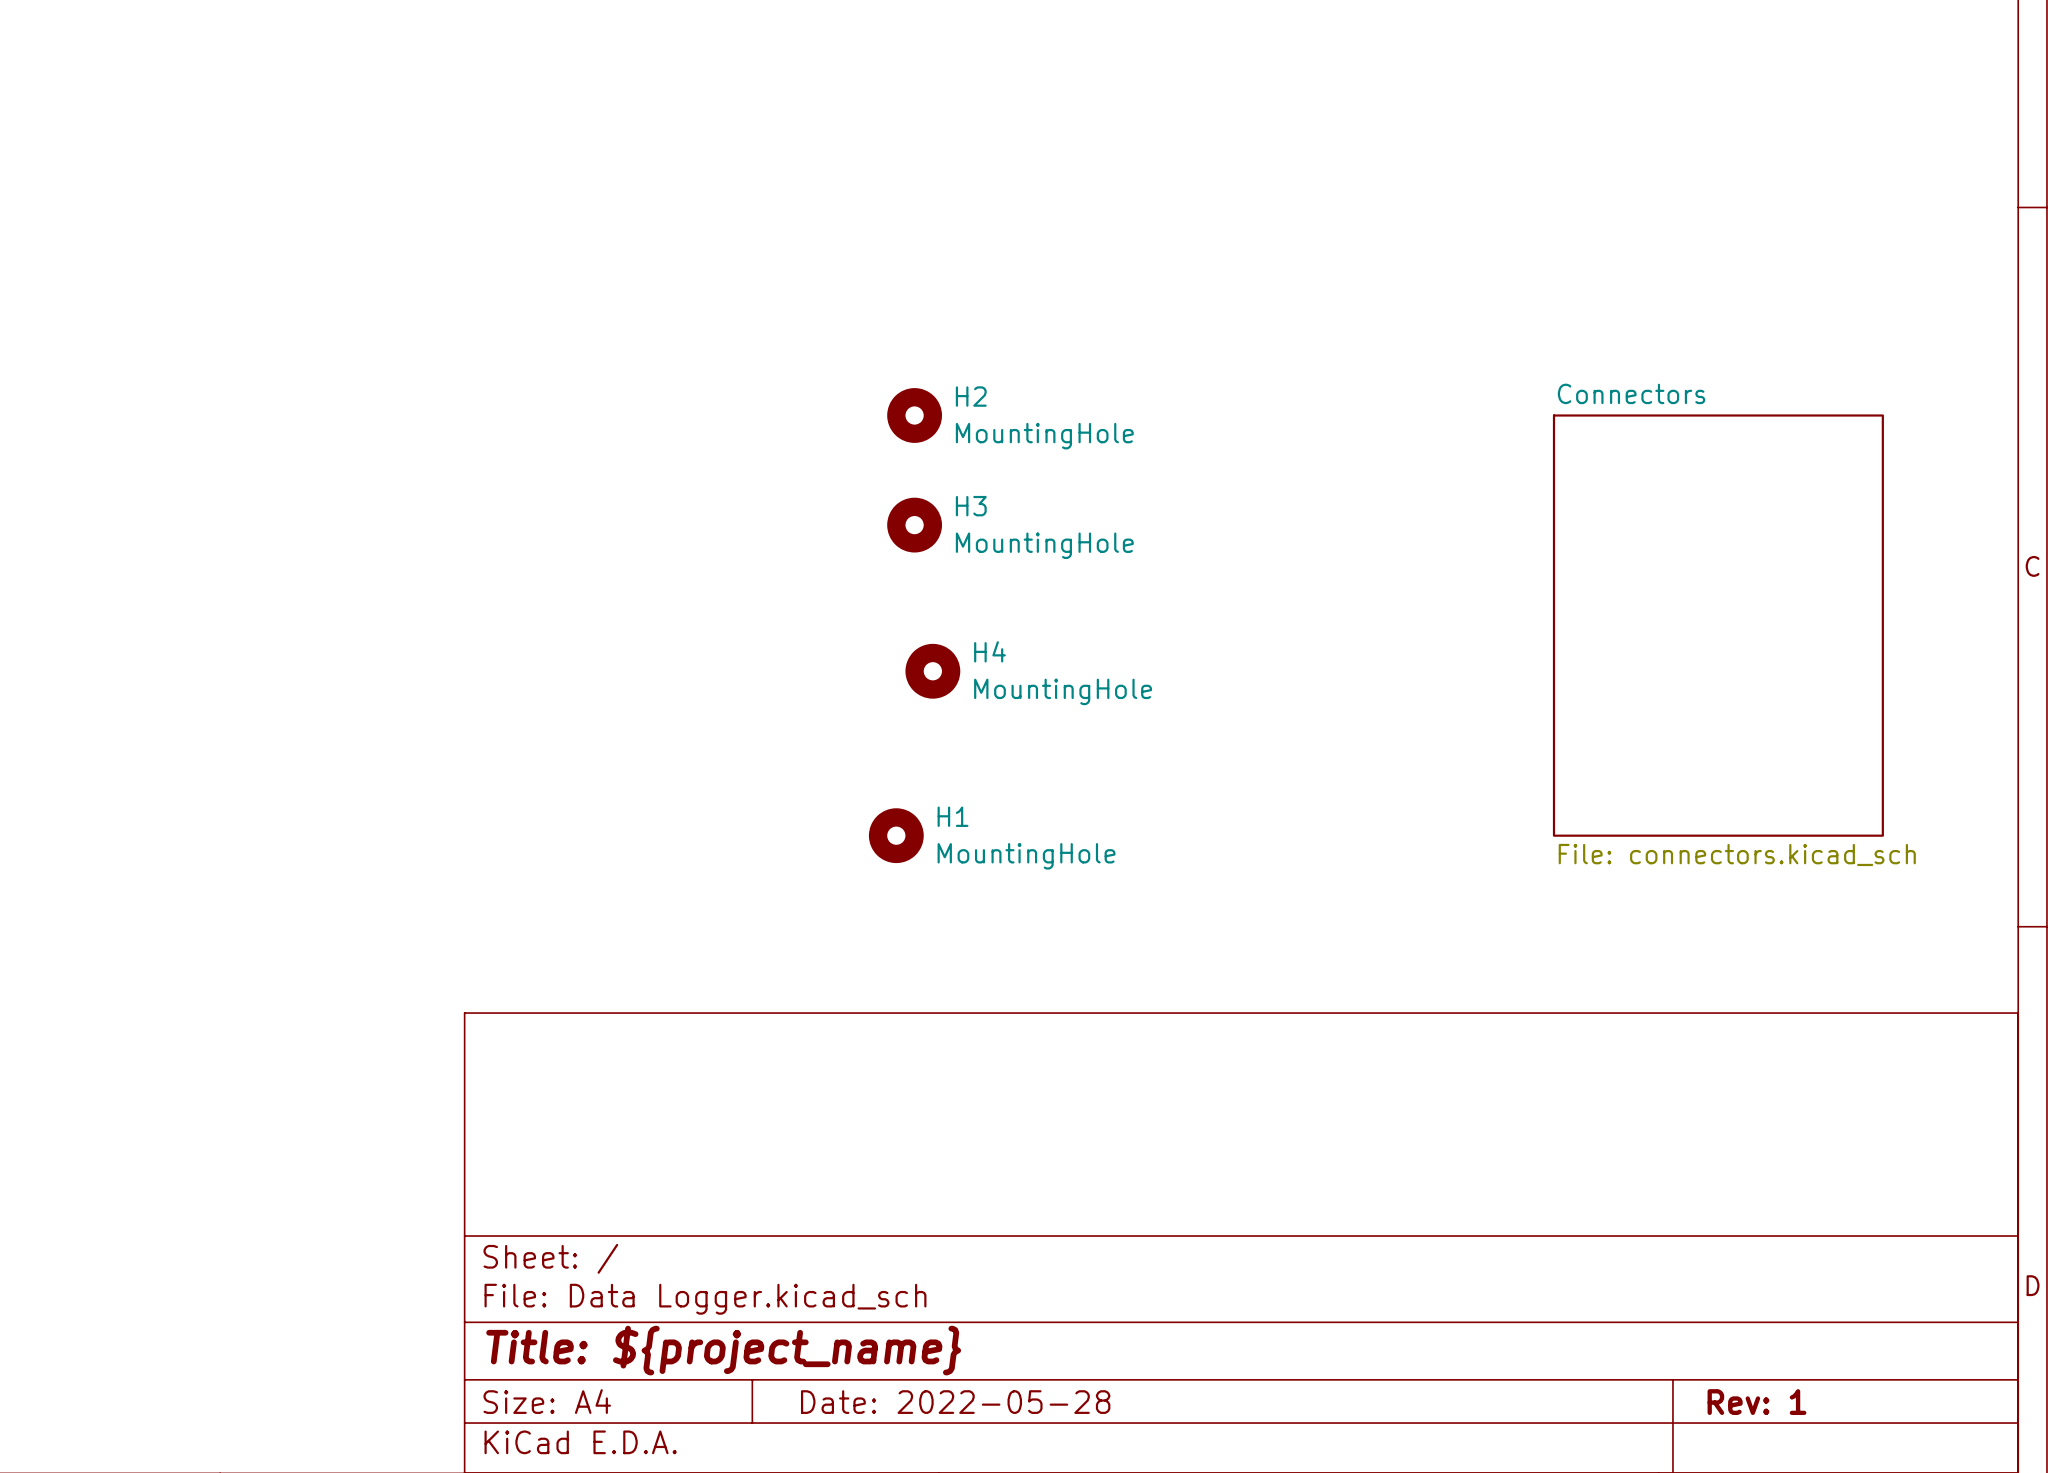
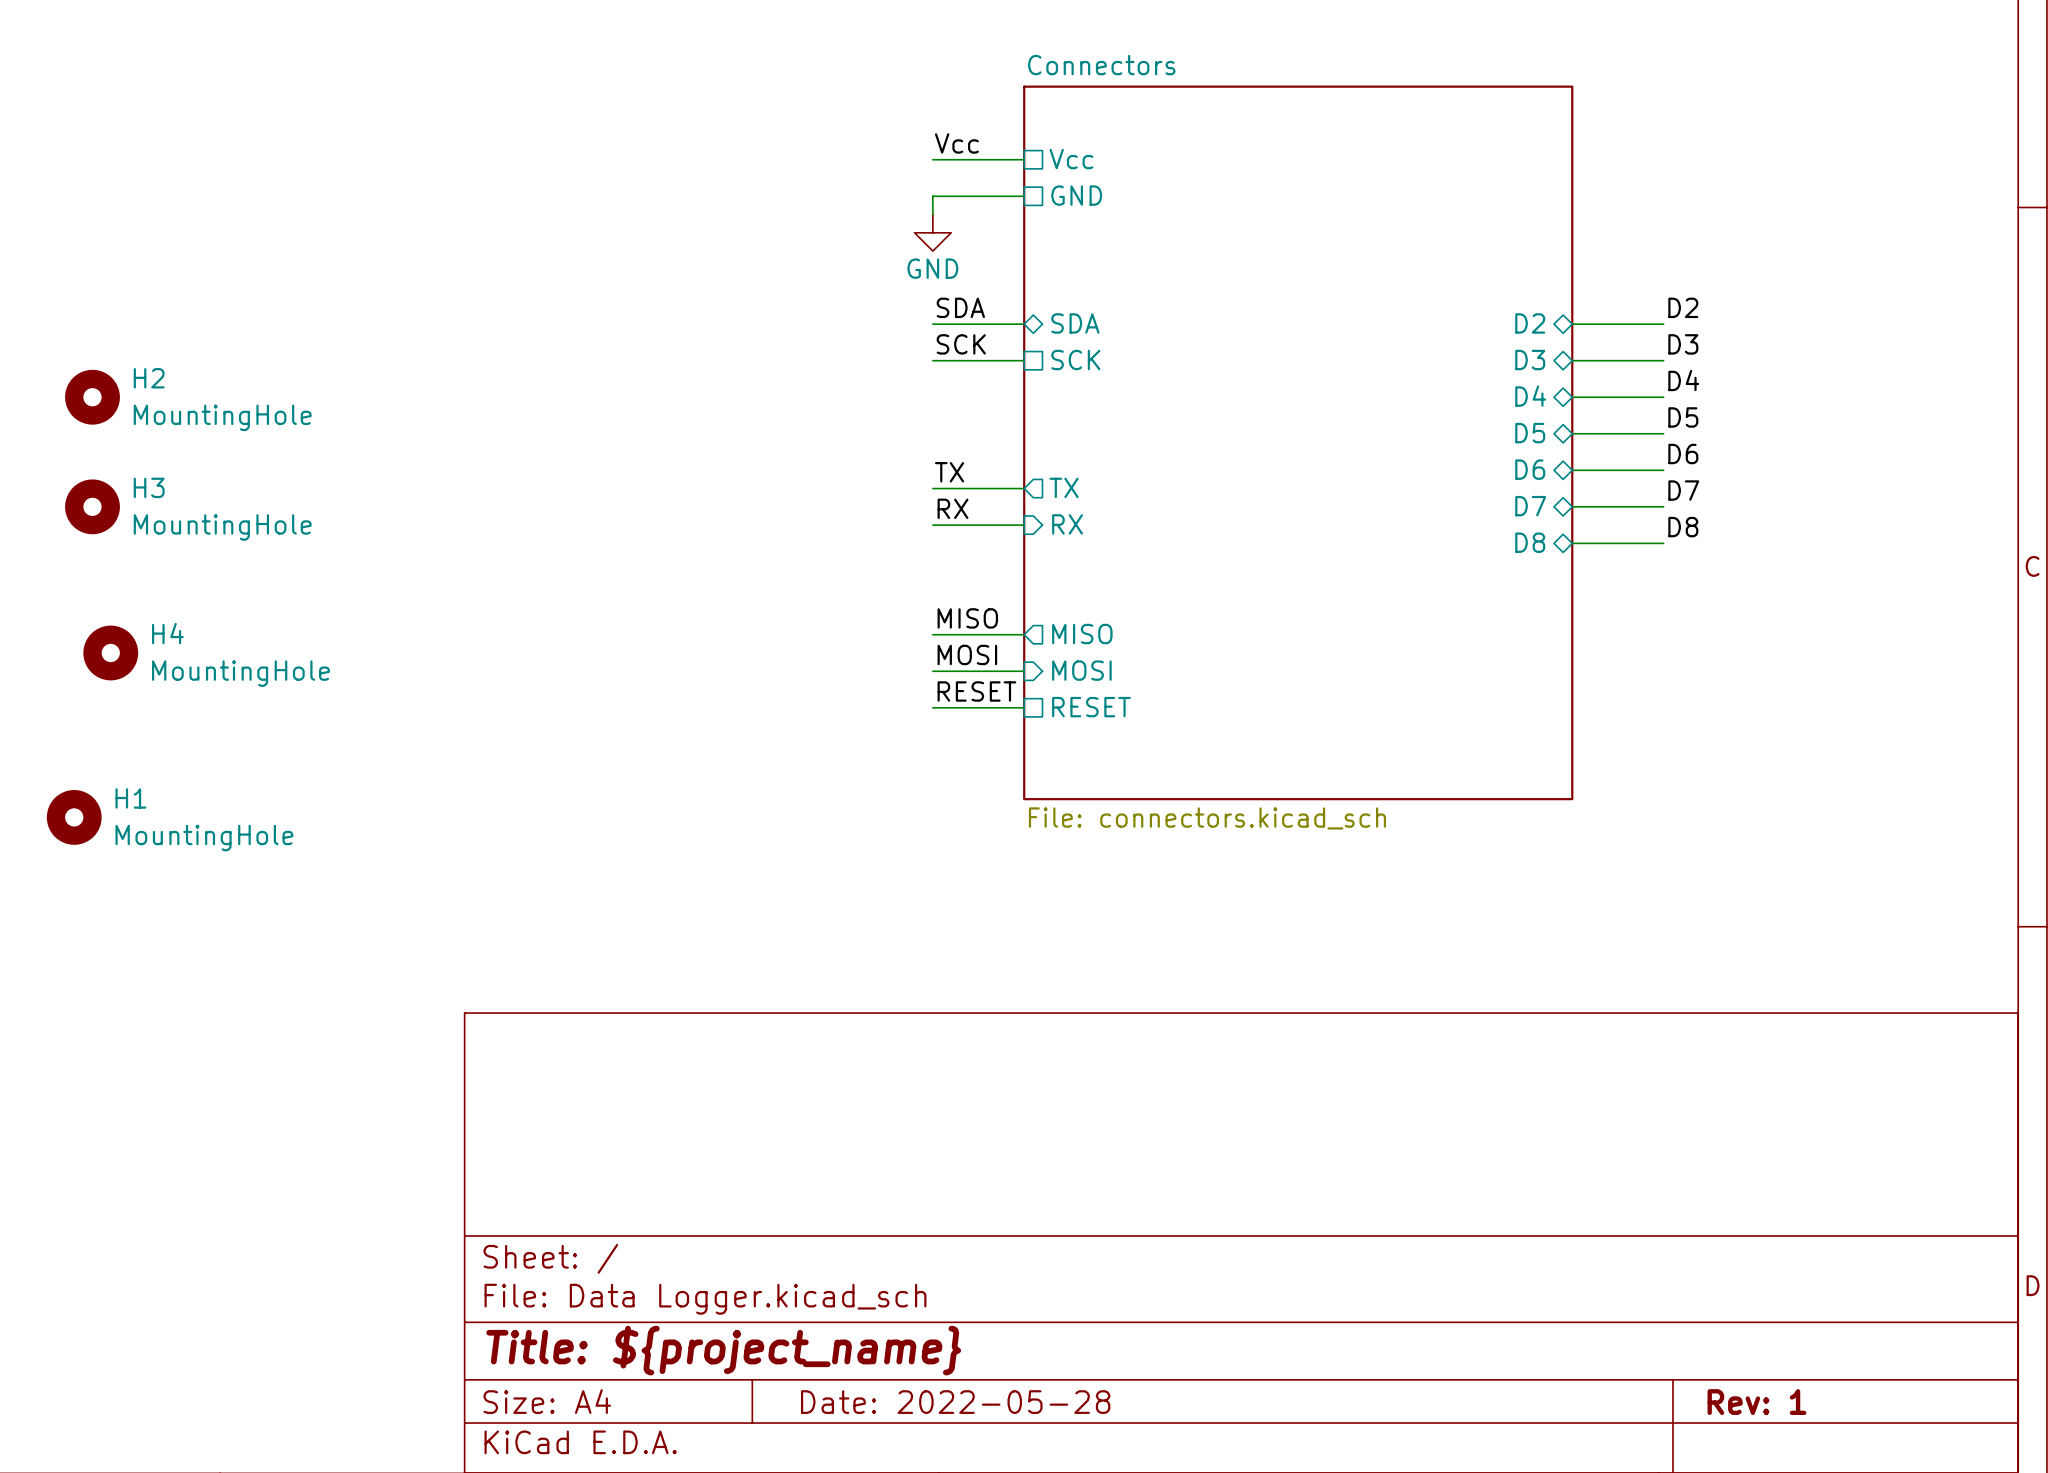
label: none -> Vcc (956, 143)
wire: none -> (932, 159) (1024, 159)
sheet pin: none -> Vcc (1071, 159)
sheet pin: none -> GND (1076, 195)
wire: none -> (1024, 196) (932, 196) (932, 214)
power symbol: none -> GND (932, 232)
label: none -> SDA (960, 307)
label: none -> D2 (1683, 307)
sheet pin: none -> SDA (1075, 323)
sheet pin: none -> D2 (1530, 323)
wire: none -> (932, 324) (1024, 324)
wire: none -> (1572, 324) (1663, 324)
label: none -> SCK (961, 344)
label: none -> D3 (1683, 344)
wire: none -> (932, 360) (1024, 360)
sheet pin: none -> SCK (1075, 360)
sheet pin: none -> D3 (1530, 360)
wire: none -> (1572, 360) (1663, 360)
label: none -> D4 (1683, 380)
sheet pin: none -> D4 (1530, 396)
wire: none -> (1572, 397) (1663, 397)
H2 position: (914, 415) -> (92, 397)
label: none -> D5 (1683, 417)
sheet pin: none -> D5 (1530, 433)
wire: none -> (1572, 433) (1663, 433)
sheet Connectors: none -> File: connectors.kicad_sch (1298, 442)
label: none -> D6 (1683, 454)
sheet pin: none -> D6 (1530, 469)
wire: none -> (1572, 470) (1663, 470)
label: none -> TX (949, 472)
sheet pin: none -> TX (1064, 487)
wire: none -> (932, 488) (1024, 488)
label: none -> D7 (1683, 490)
sheet pin: none -> D7 (1530, 506)
wire: none -> (1572, 506) (1663, 506)
label: none -> RX (953, 508)
sheet pin: none -> RX (1067, 524)
H3 position: (914, 525) -> (92, 506)
wire: none -> (932, 525) (1024, 525)
label: none -> D8 (1683, 527)
sheet pin: none -> D8 (1530, 542)
wire: none -> (1572, 543) (1663, 543)
label: none -> MISO (967, 618)
sheet Connectors: File: connectors.kicad_sch (1718, 625) -> none
wire: none -> (932, 634) (1024, 634)
sheet pin: none -> MISO (1082, 634)
label: none -> MOSI (967, 654)
sheet pin: none -> MOSI (1081, 670)
wire: none -> (932, 671) (1024, 671)
H4 position: (932, 671) -> (110, 652)
label: none -> RESET (976, 691)
wire: none -> (932, 707) (1024, 707)
sheet pin: none -> RESET (1091, 707)
H1 position: (896, 835) -> (74, 817)

